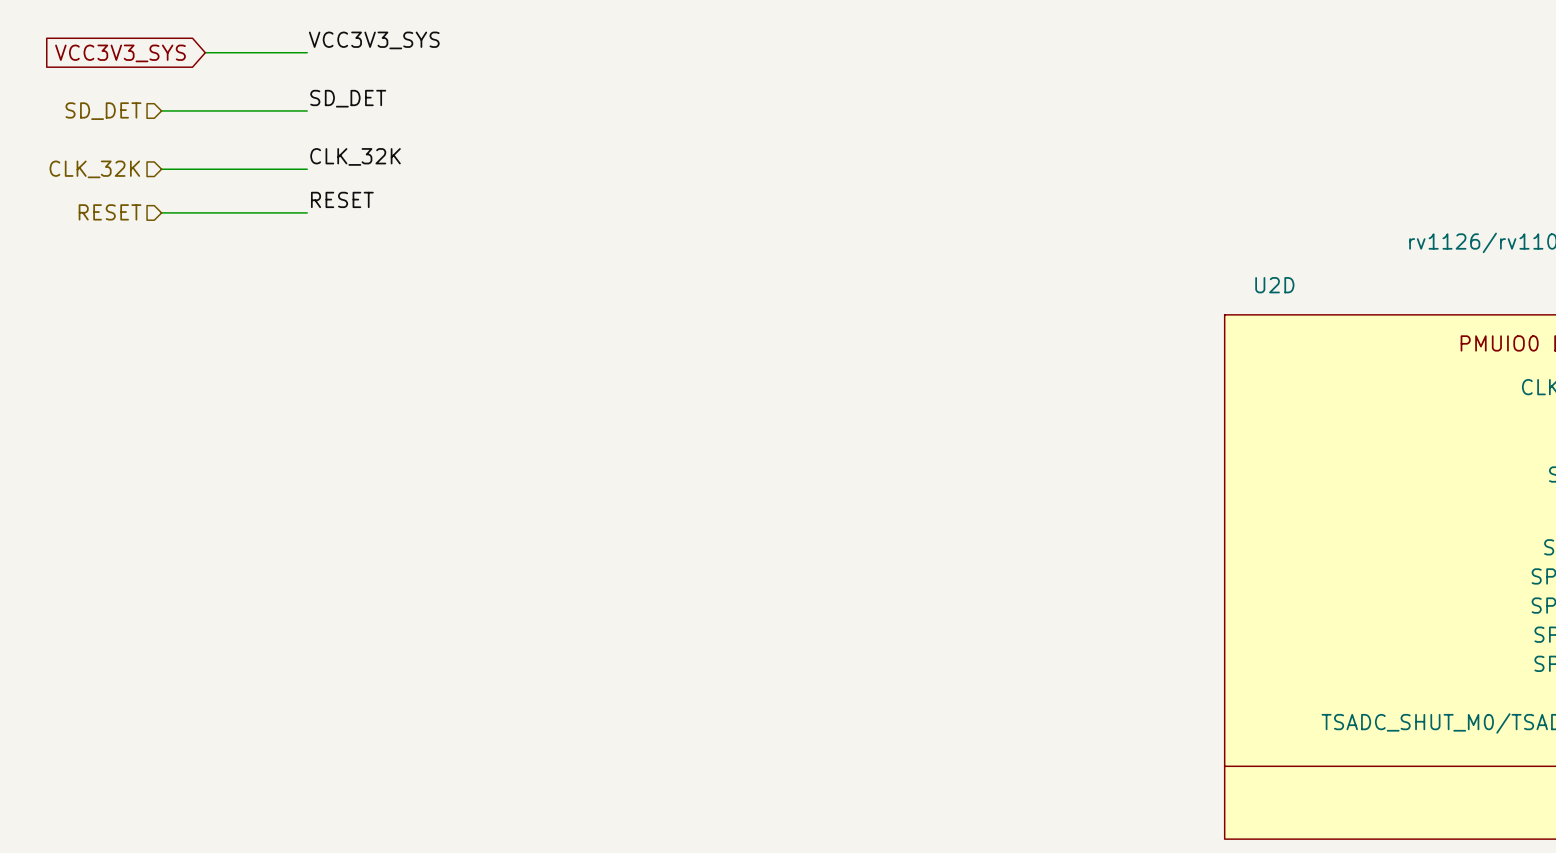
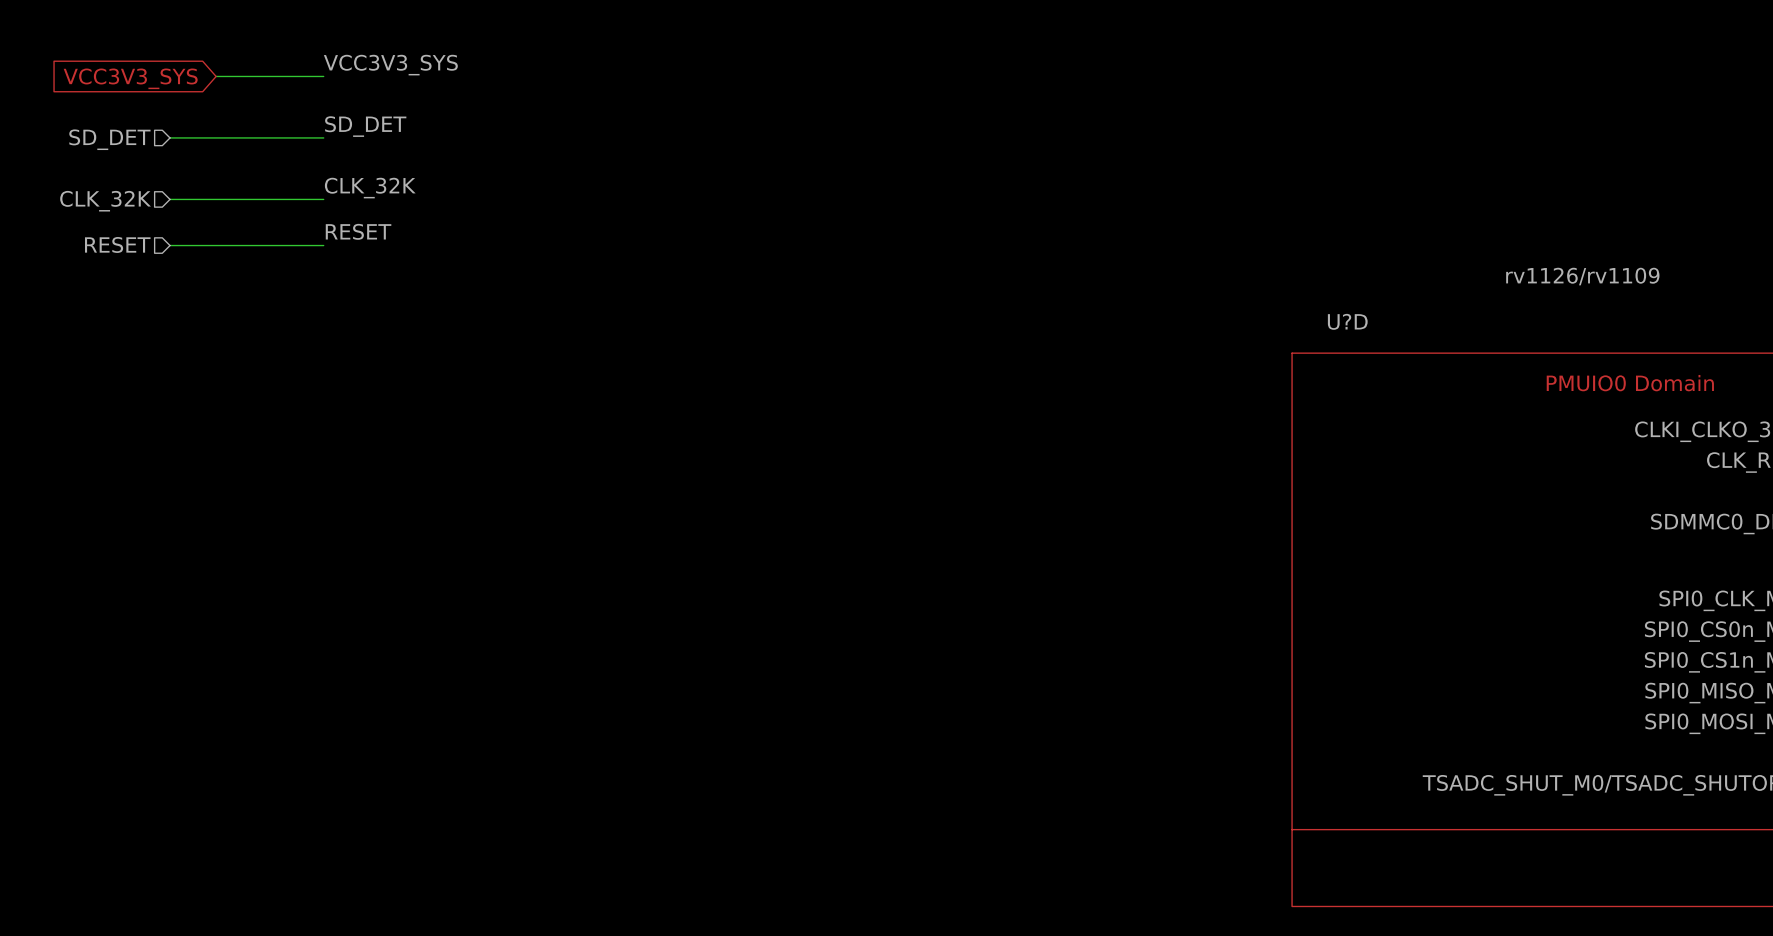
U2D name: U2D (1274, 285) -> U?D (1347, 321)

